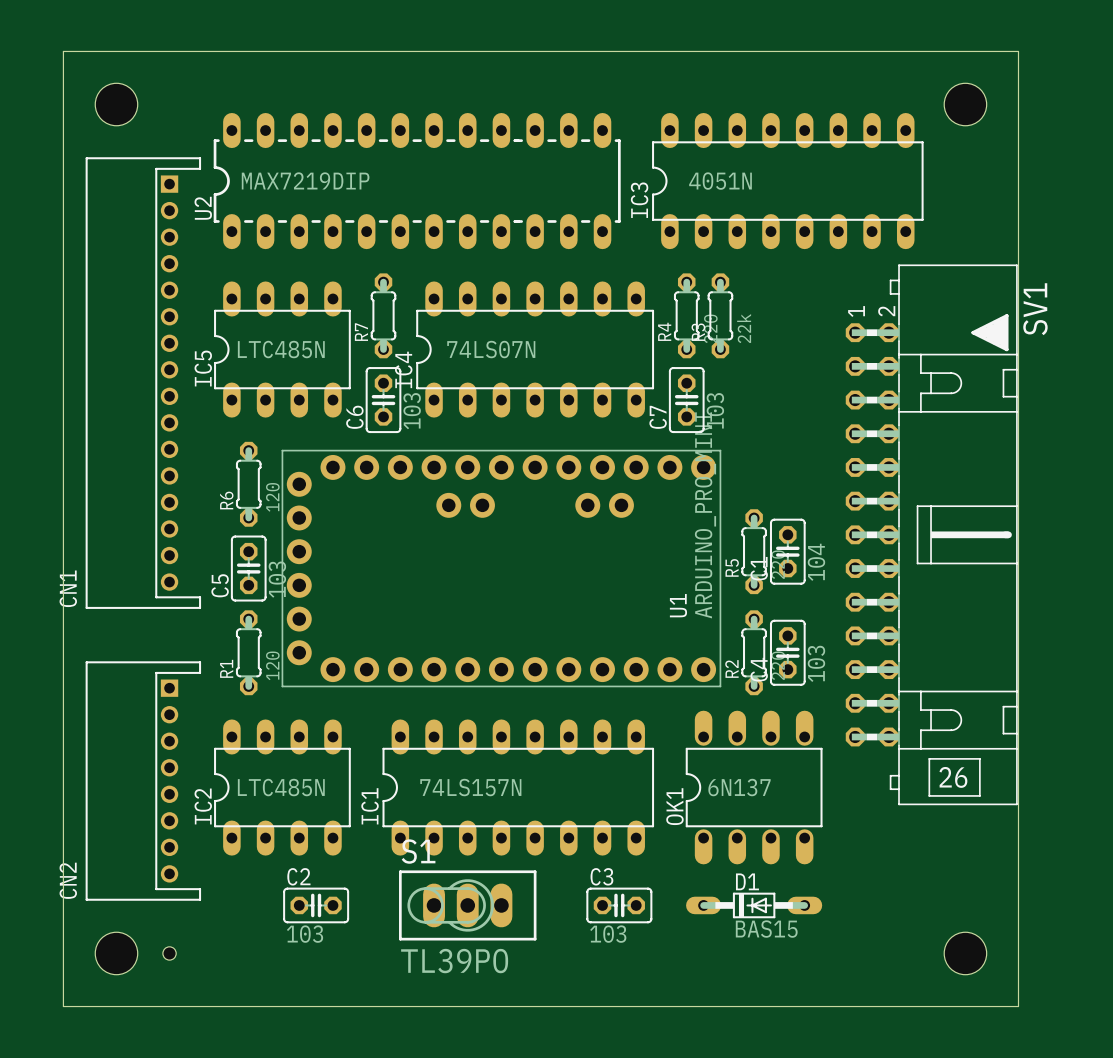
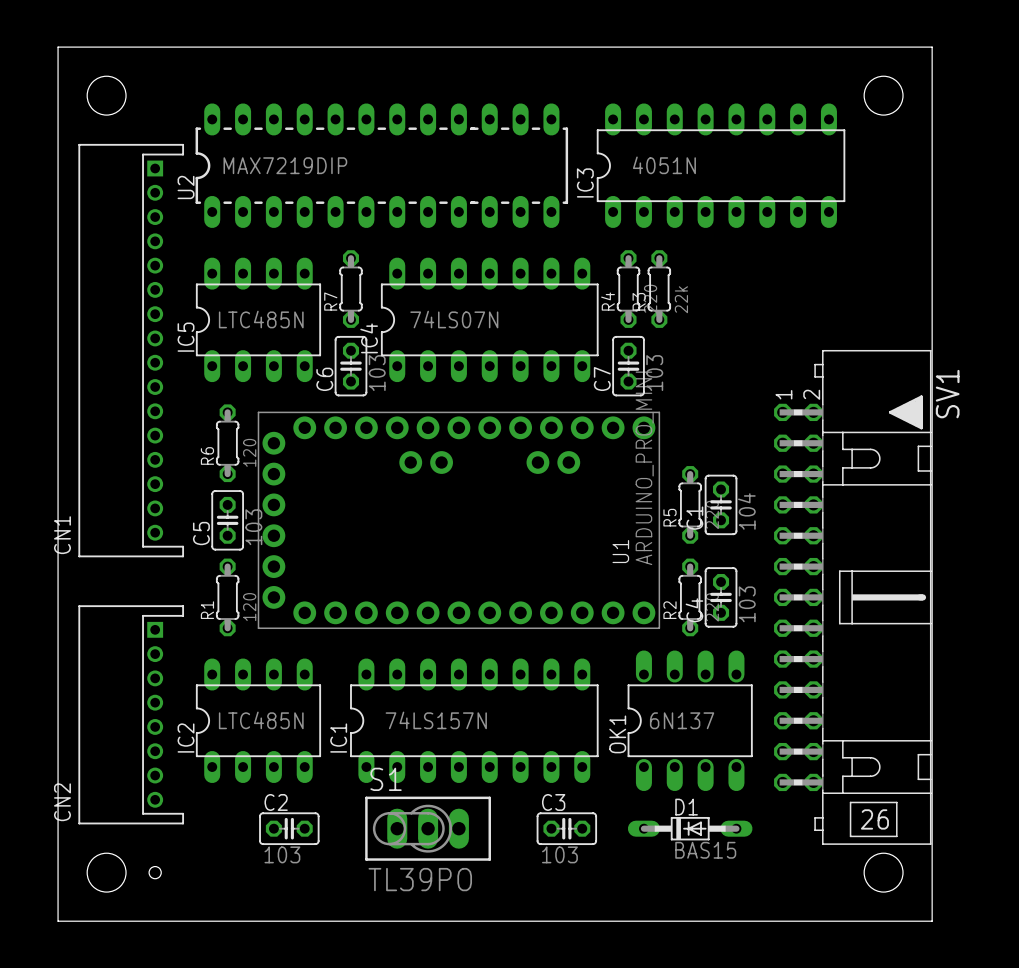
SV1 position: (931, 534) -> (852, 597)

